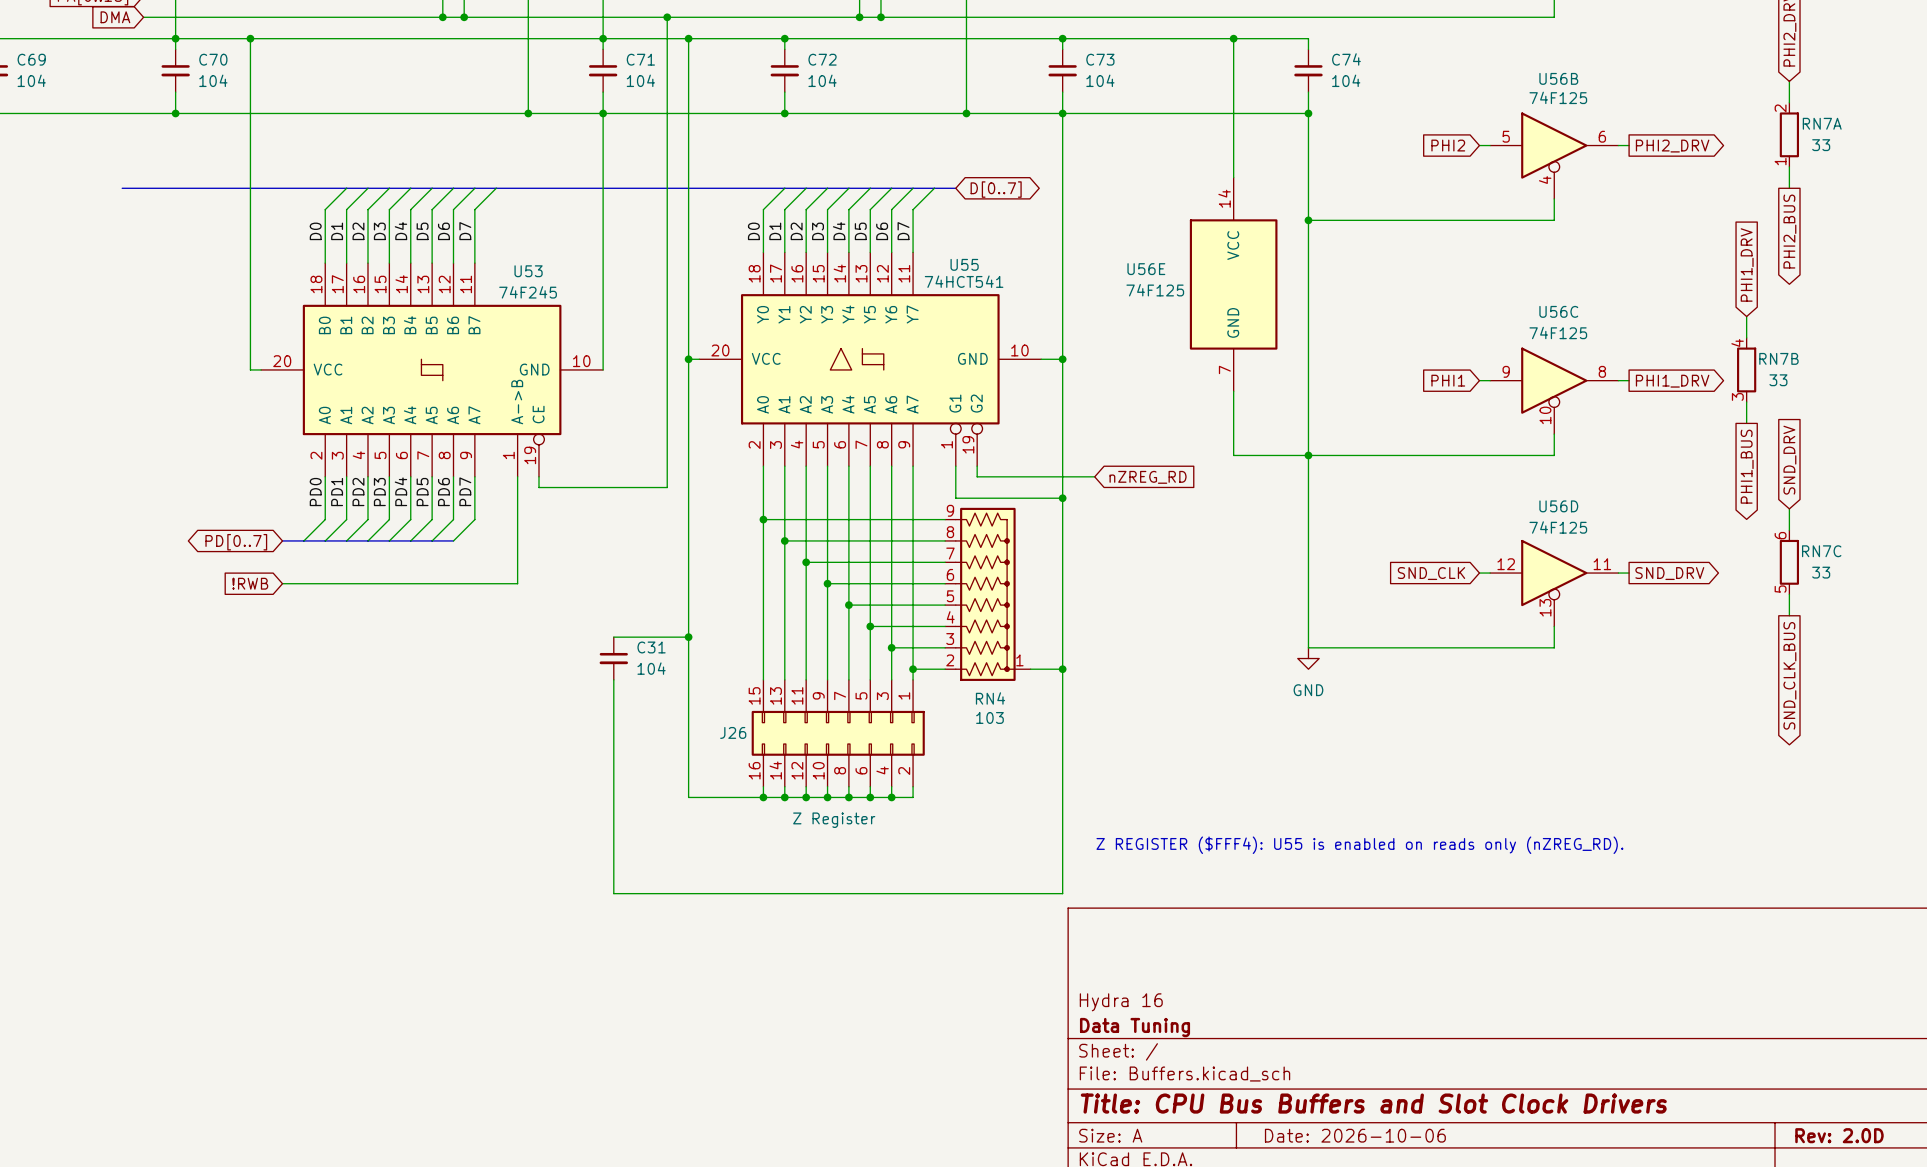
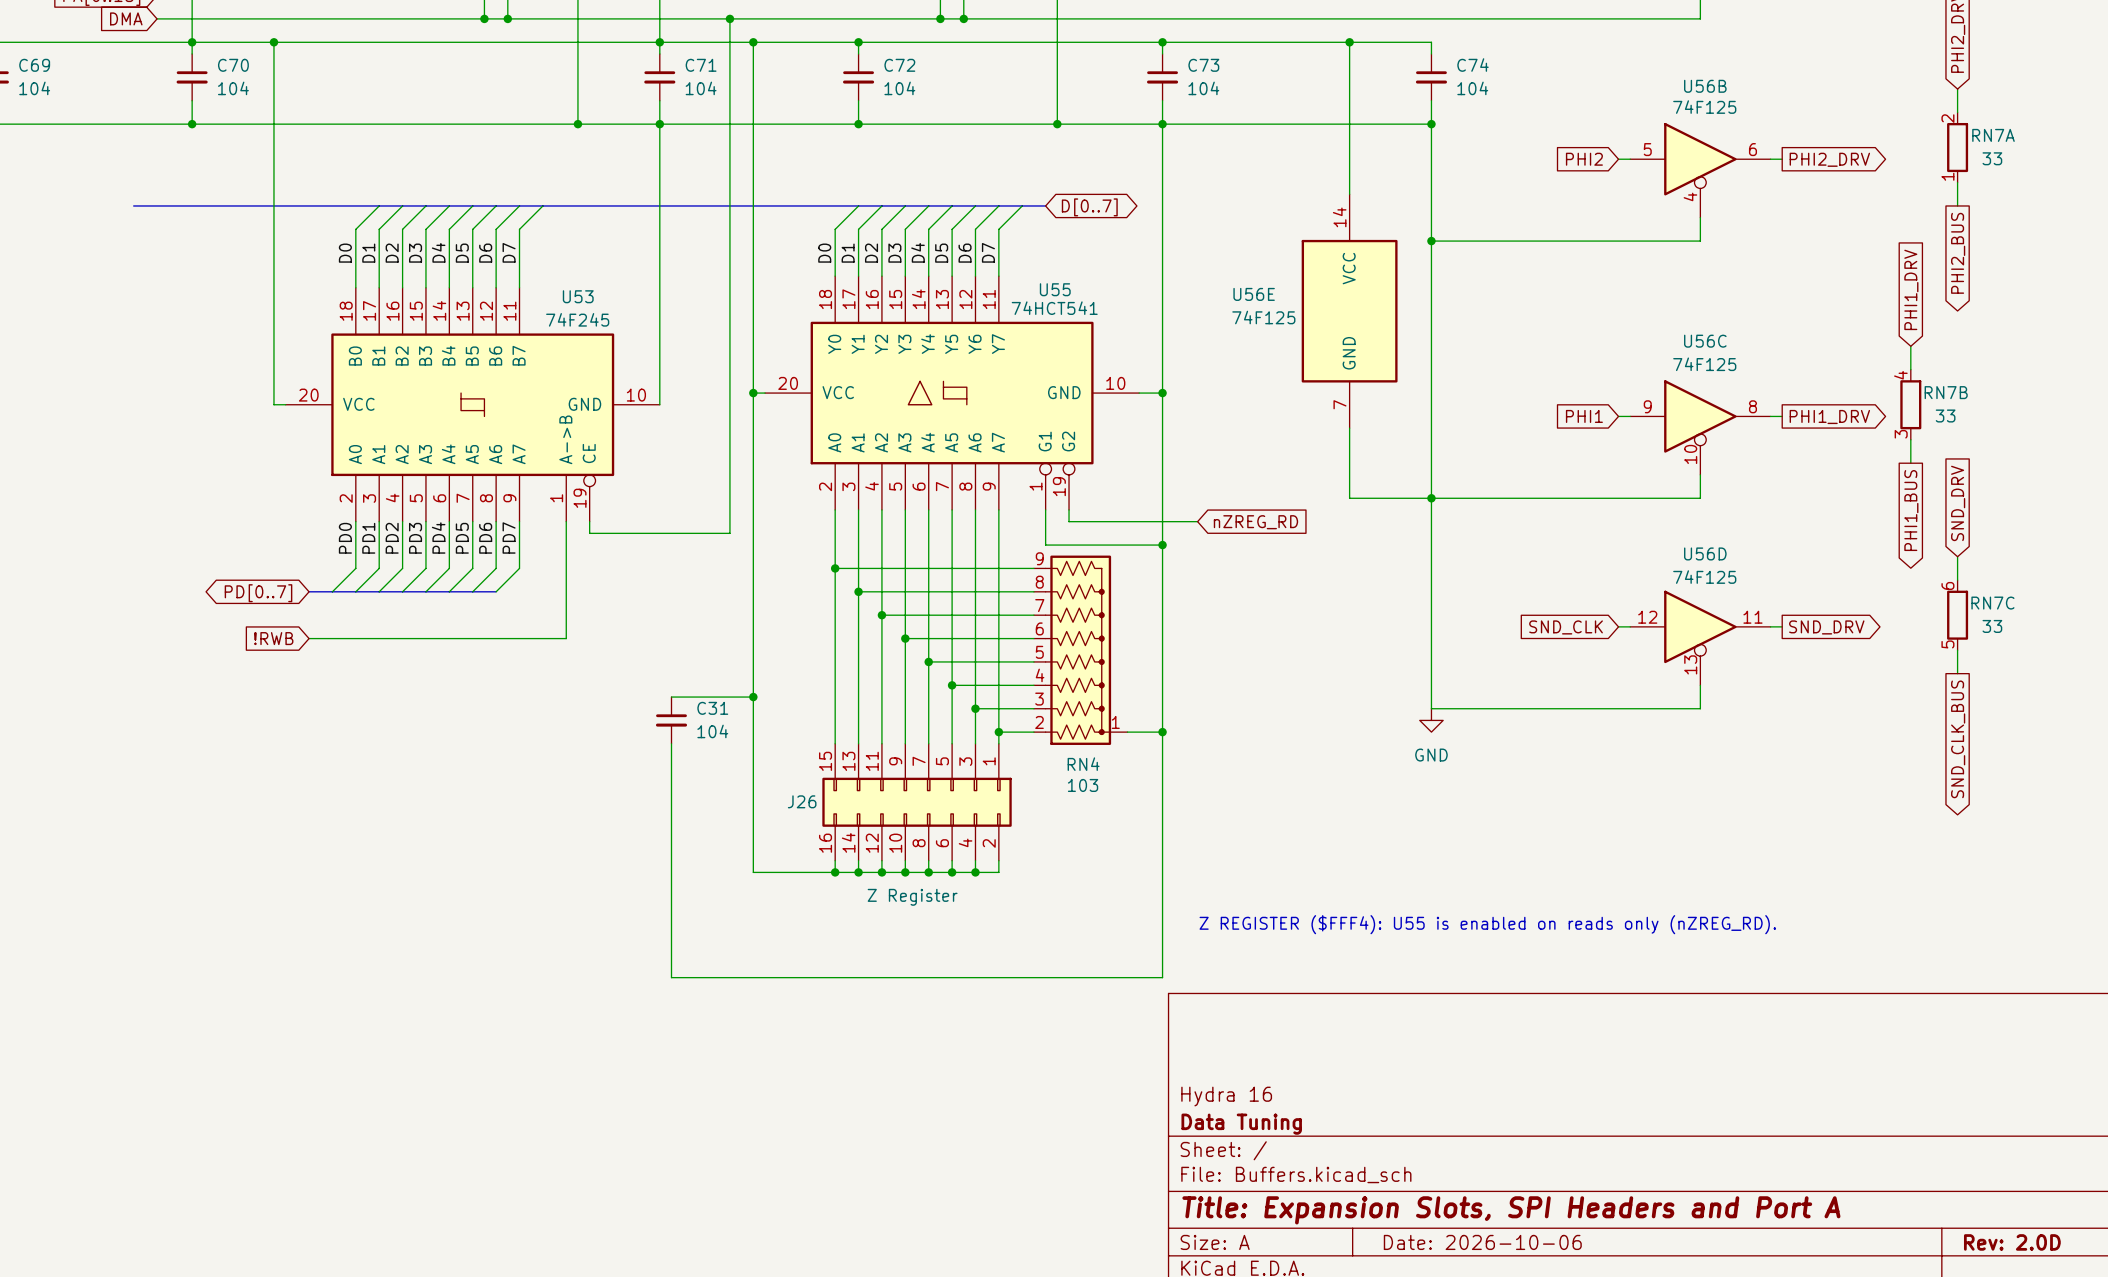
title block: Title: CPU Bus Buffers and Slot Clock Drivers (1373, 1103) -> Title: Expansion Slots, SPI Headers and Port A (1511, 1210)

